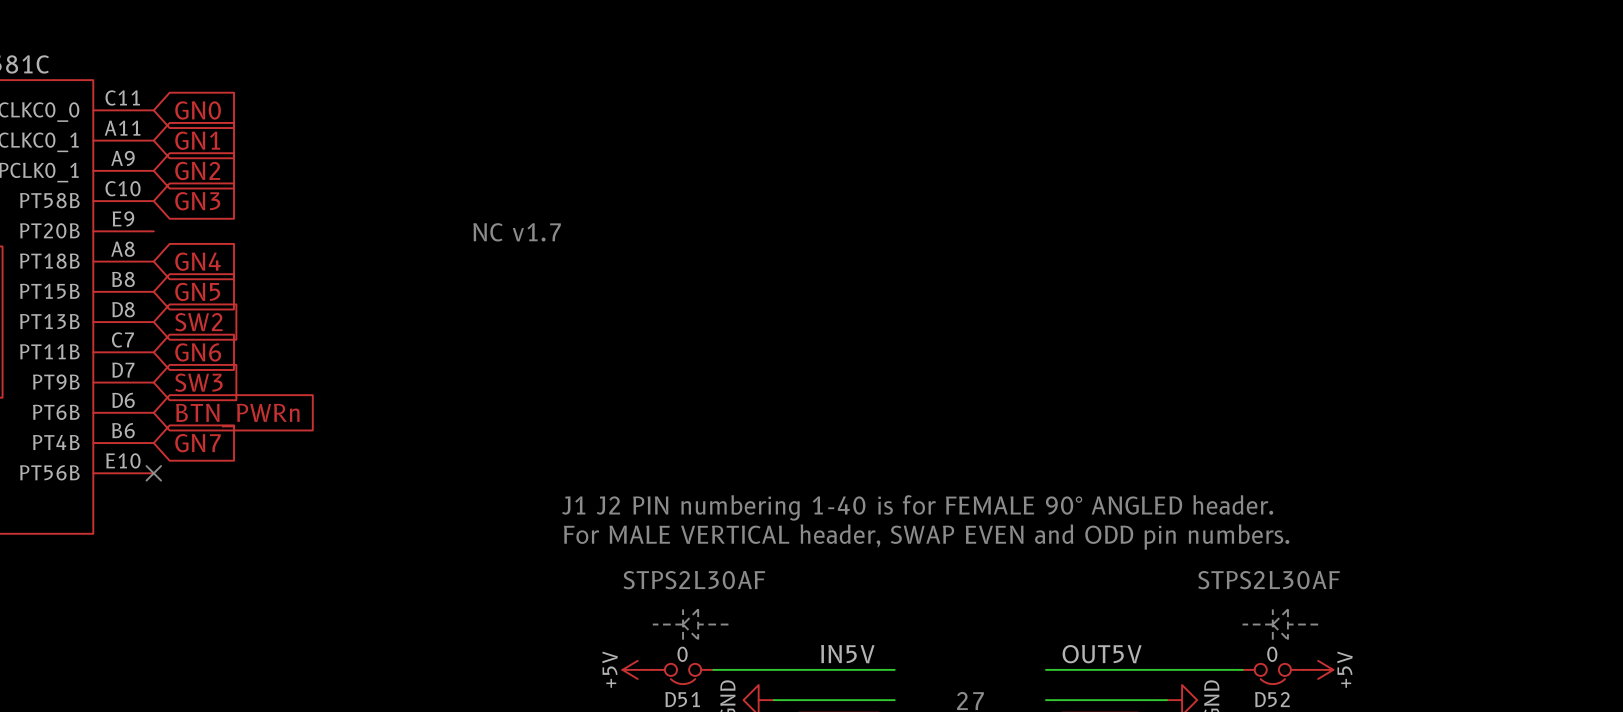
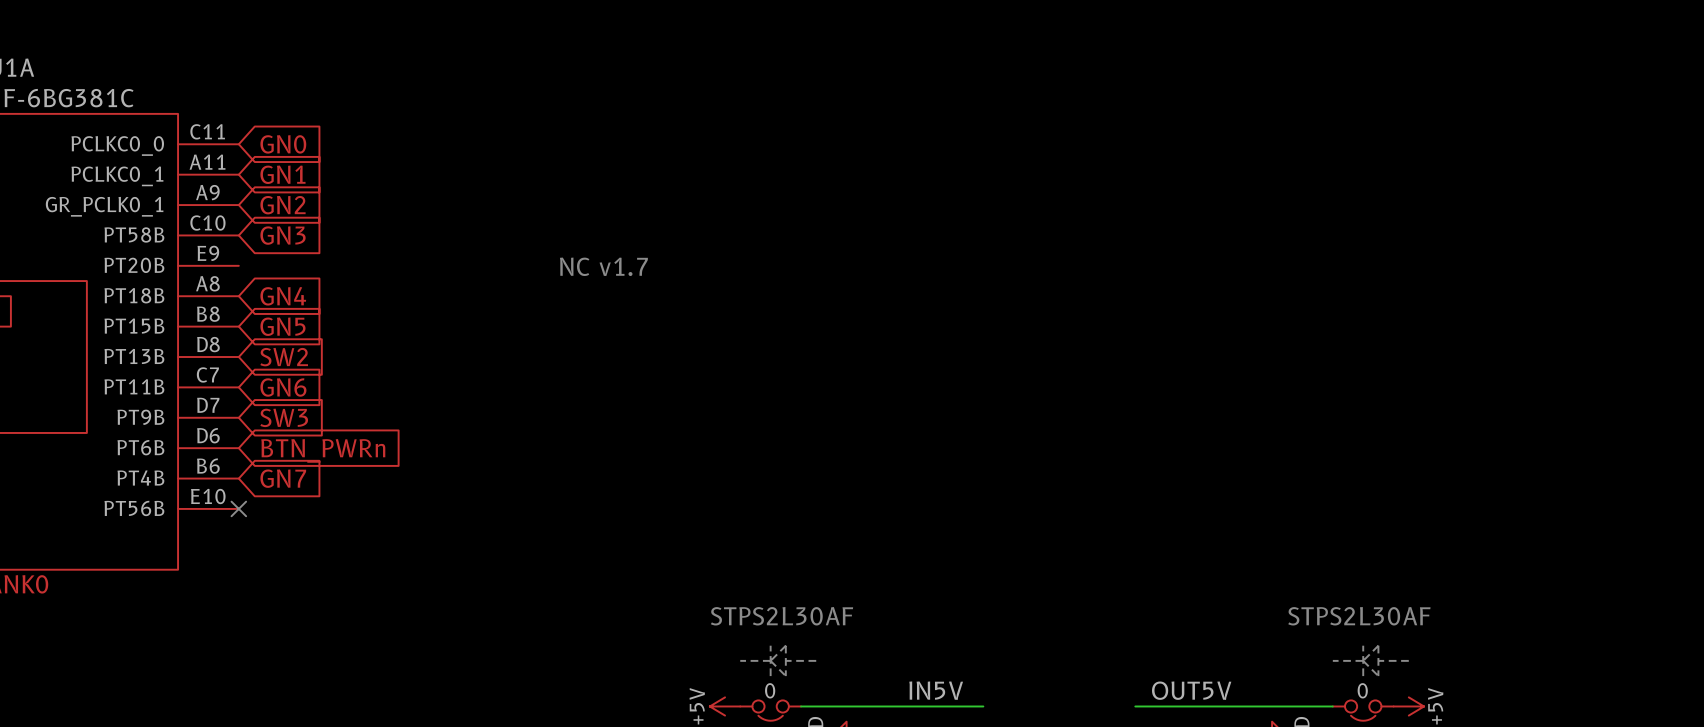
text: J1 J2 PIN numbering 1-40 is for FEMALE 90° ANGLED header. (917, 507) -> none
text: For MALE VERTICAL header, SWAP EVEN and ODD pin numbers. (926, 537) -> none

